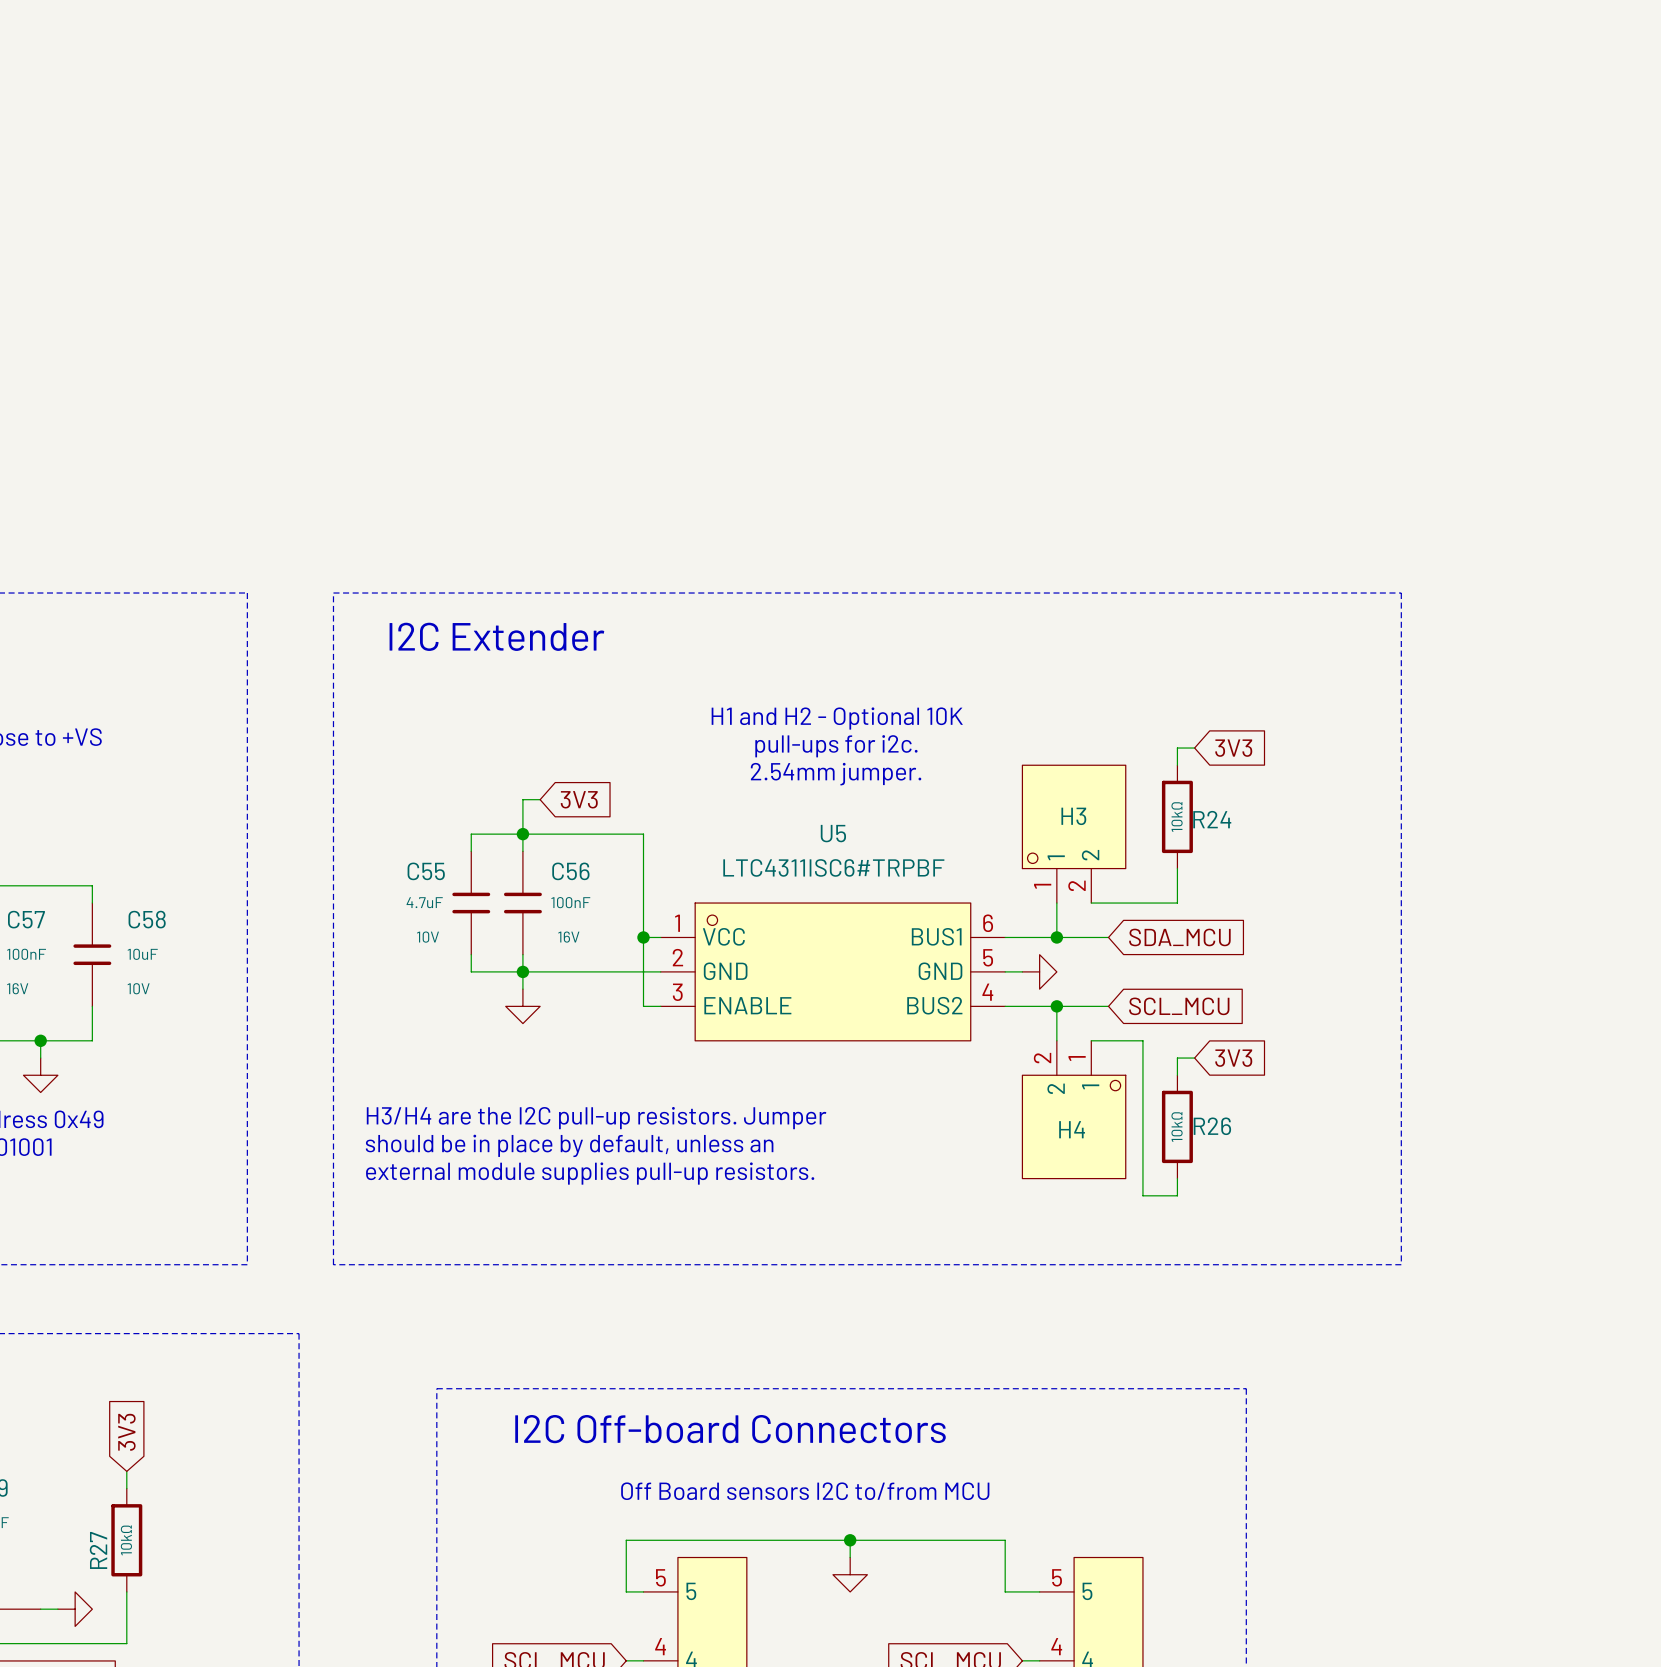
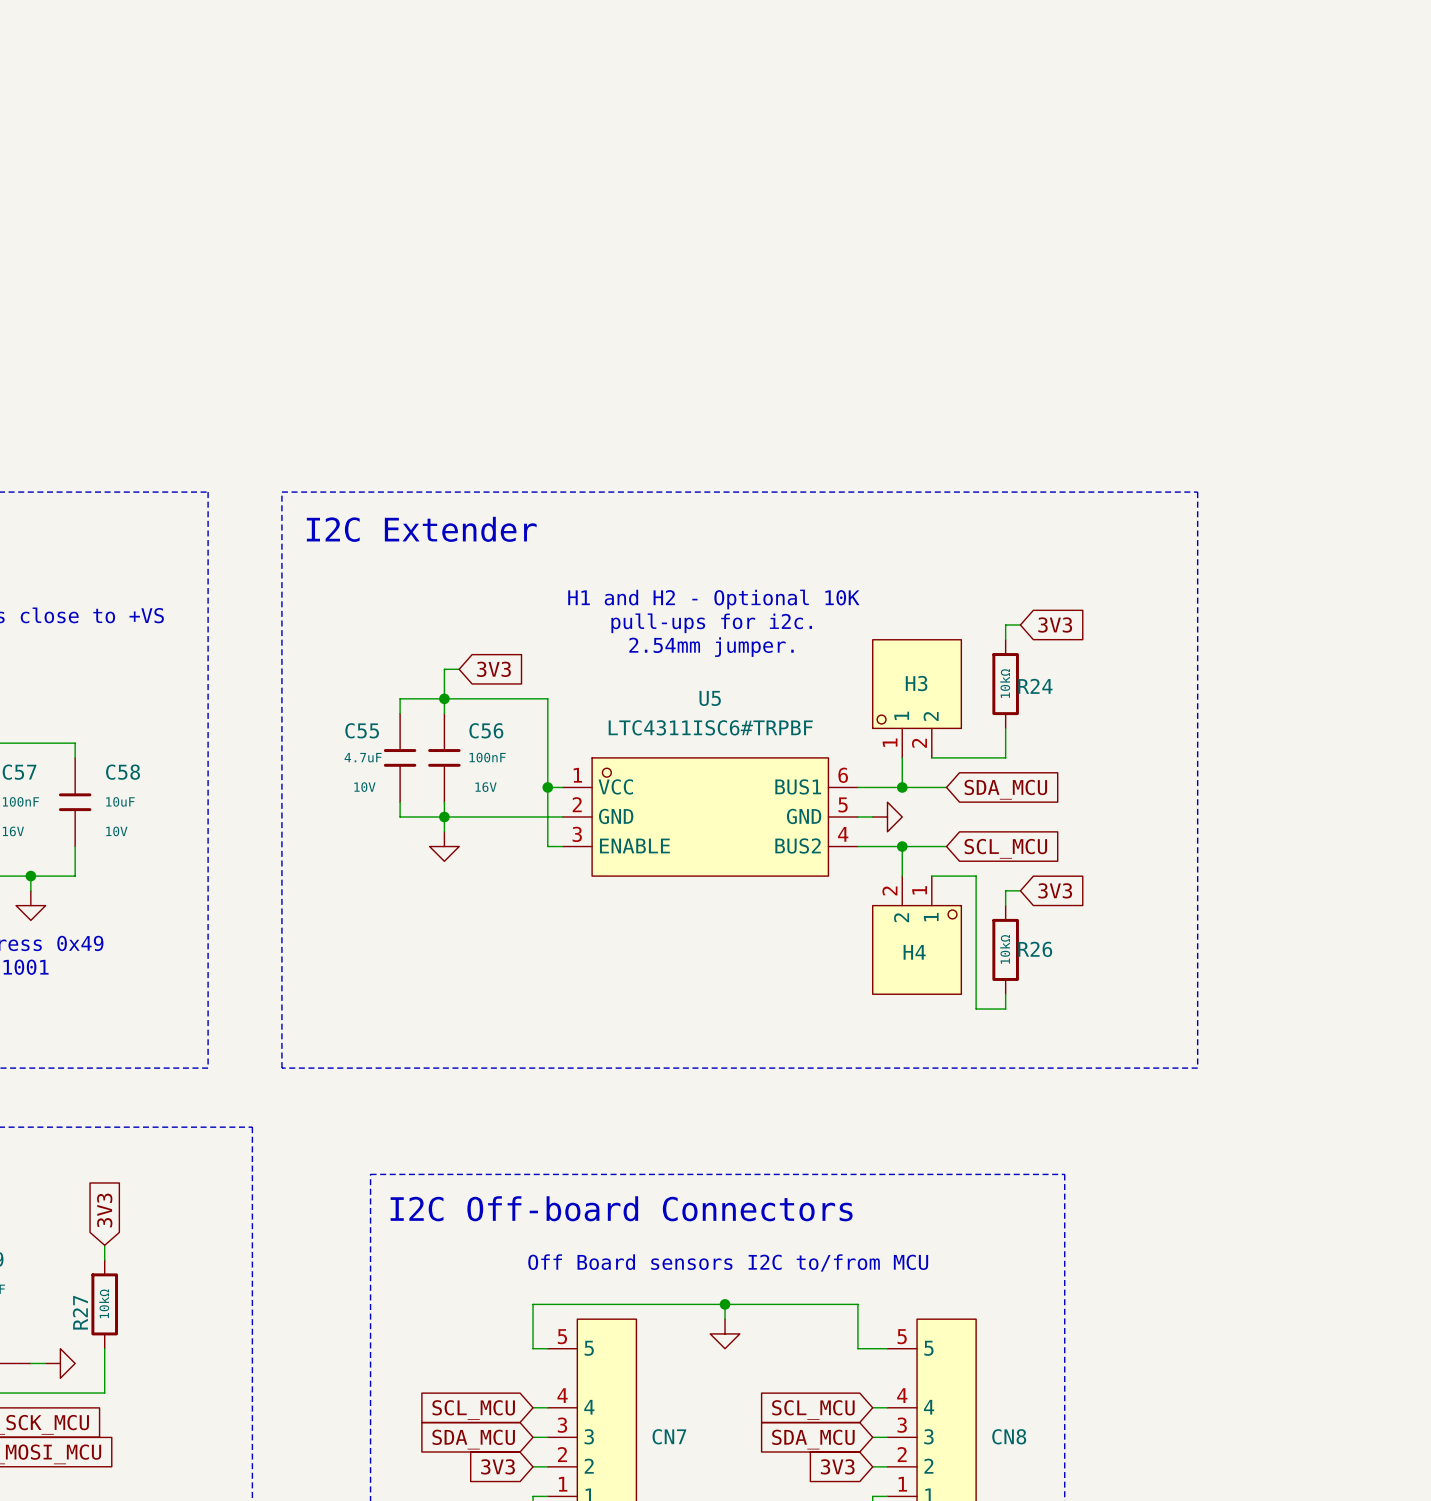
text: H3/H4 are the I2C pull-up resistors. Jumper (596, 1118) -> none
text: should be in place by default, unless an (569, 1145) -> none
text: external module supplies pull-up resistors. (590, 1173) -> none

